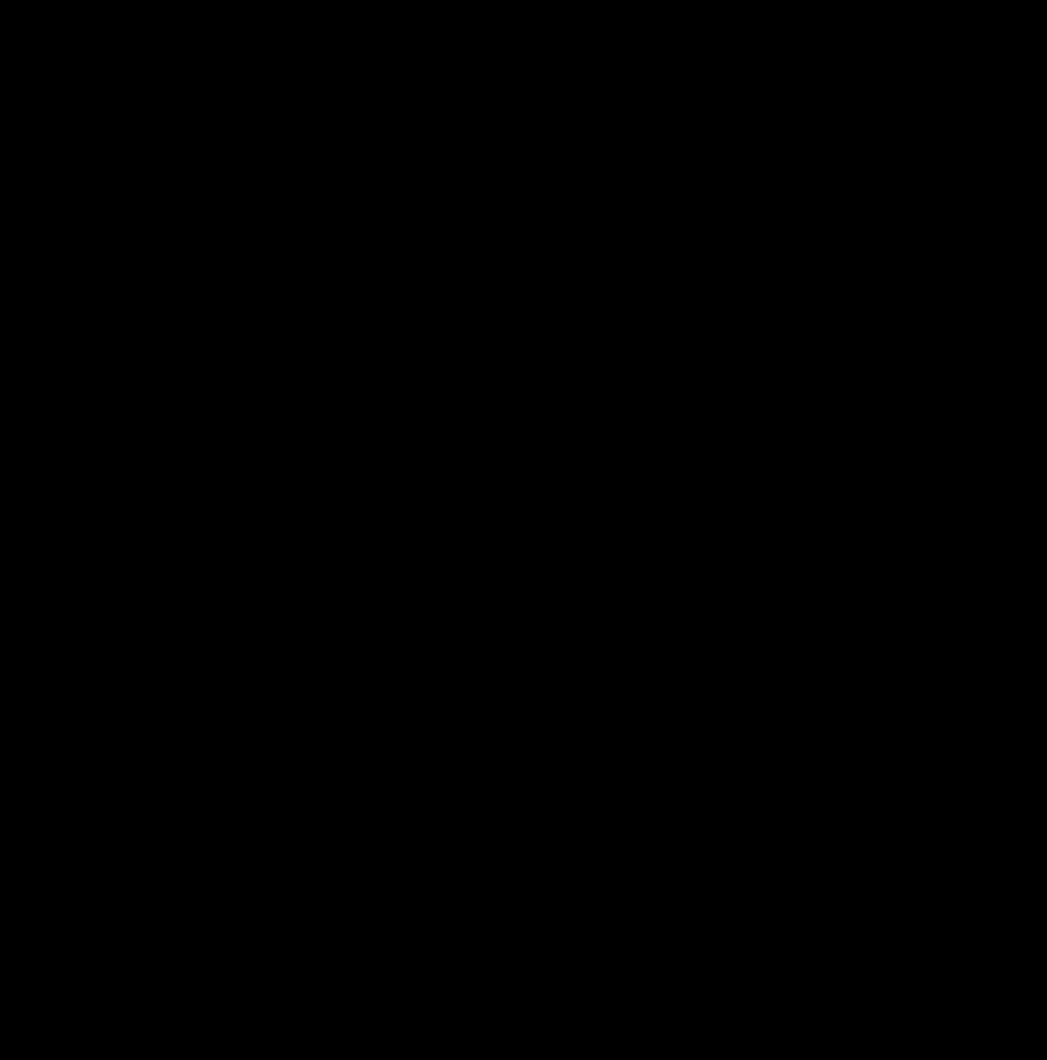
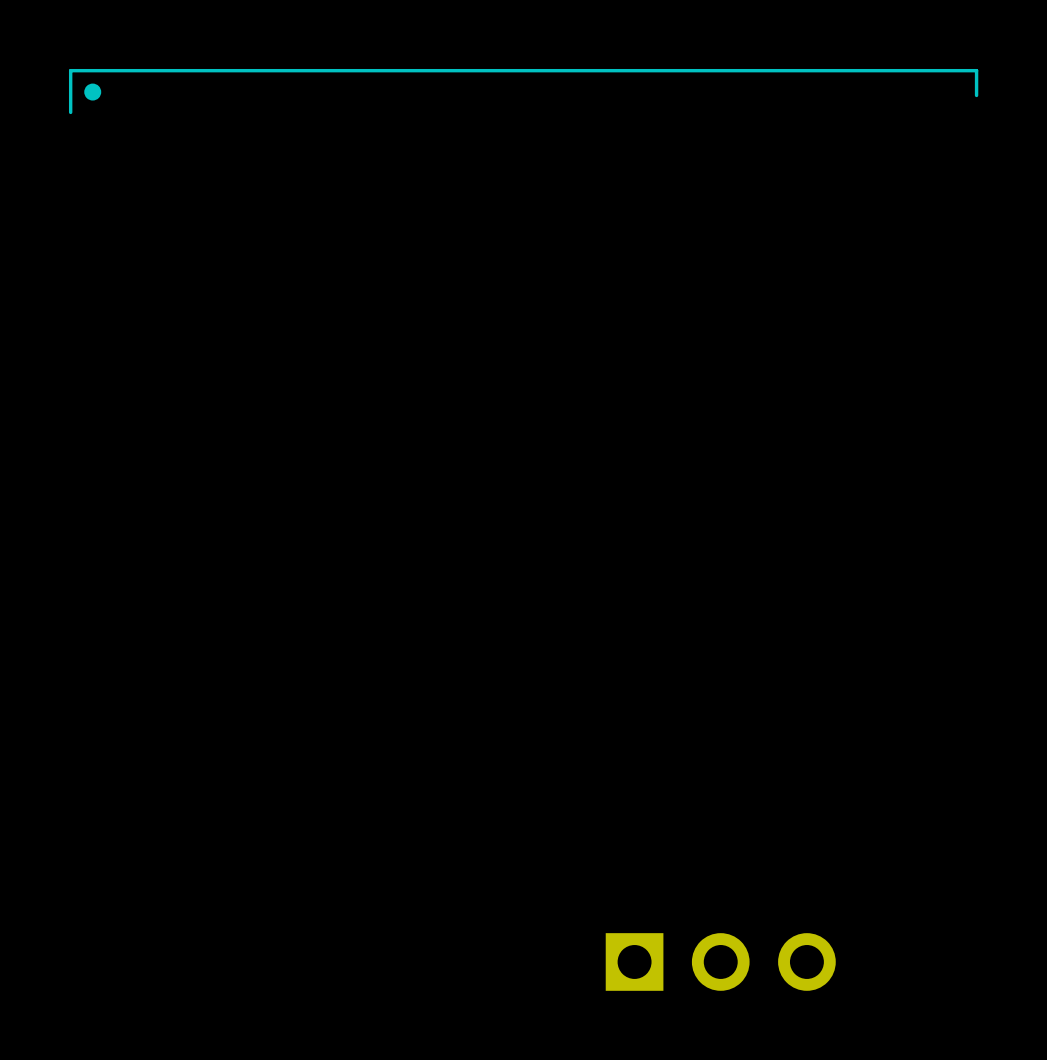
drawing: none -> [68, 68, 979, 115]
part: none -> (720, 961)

